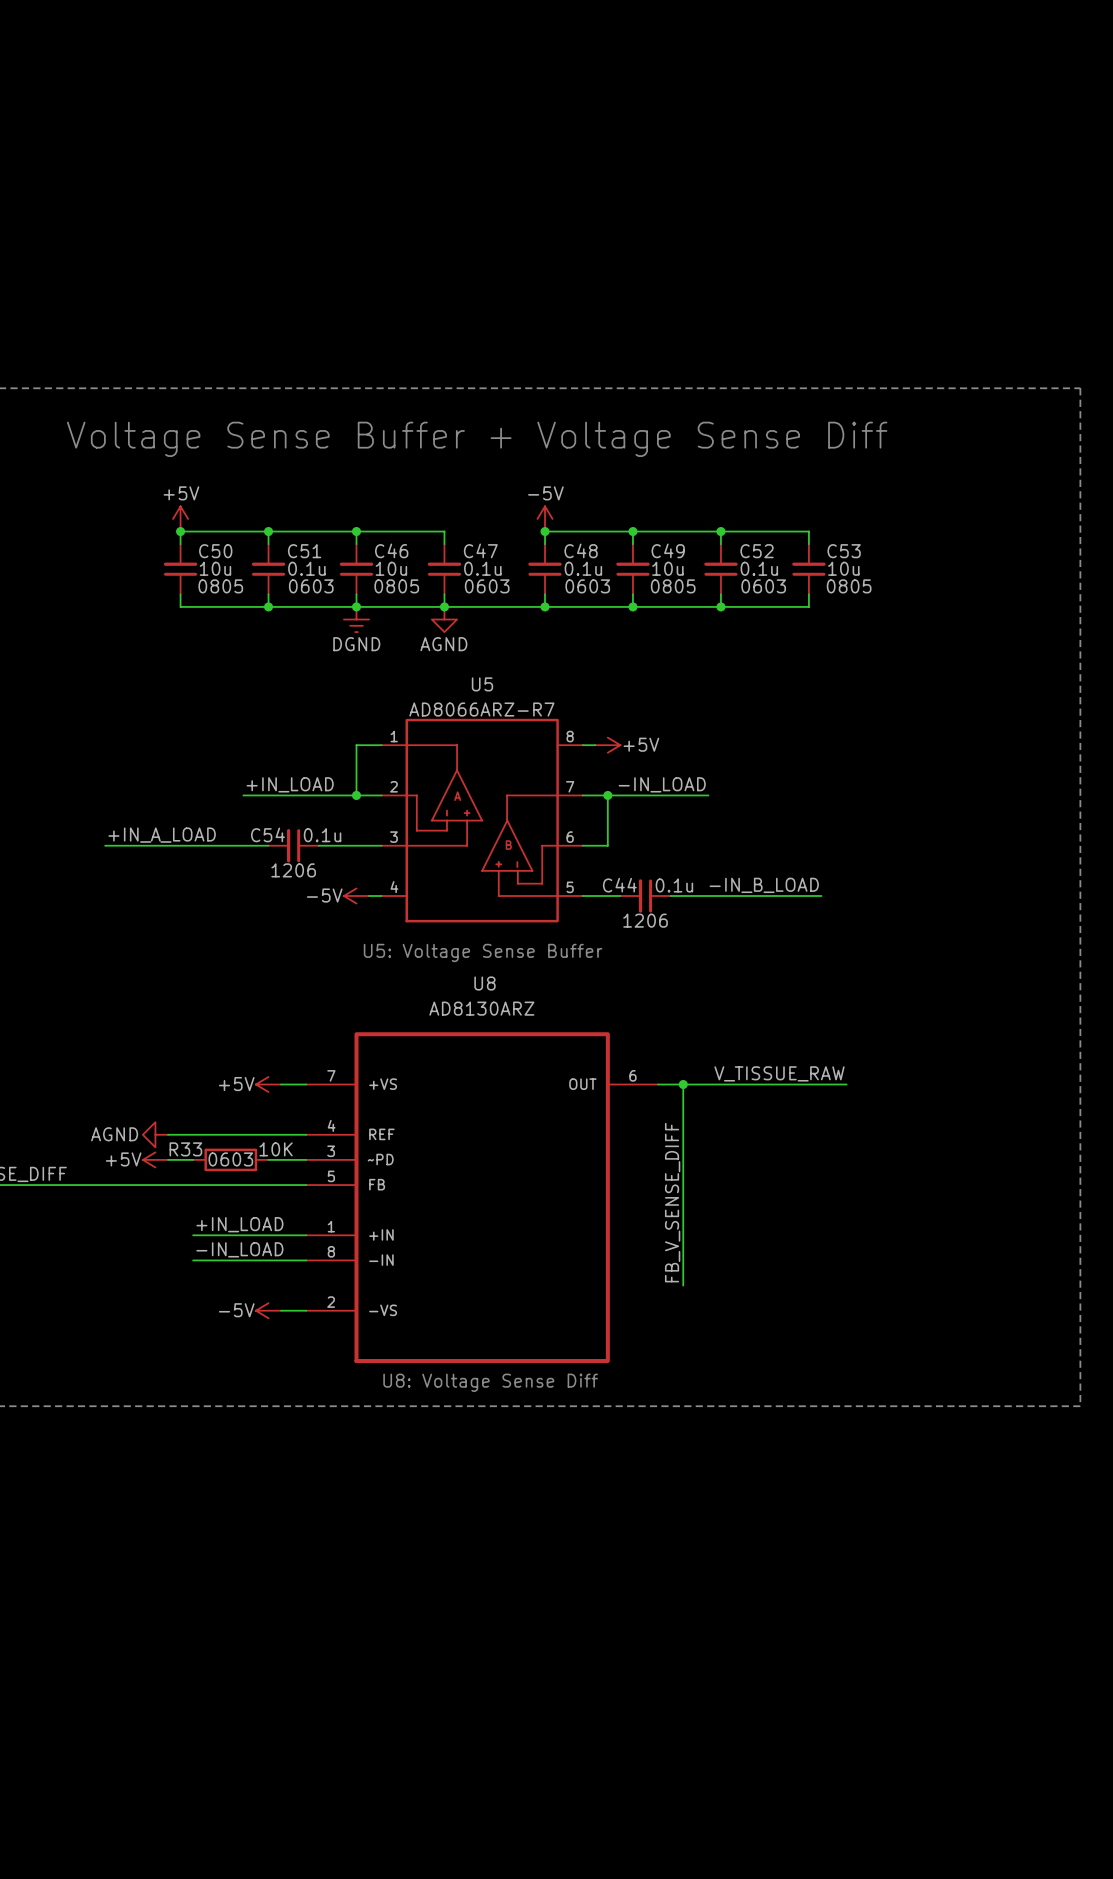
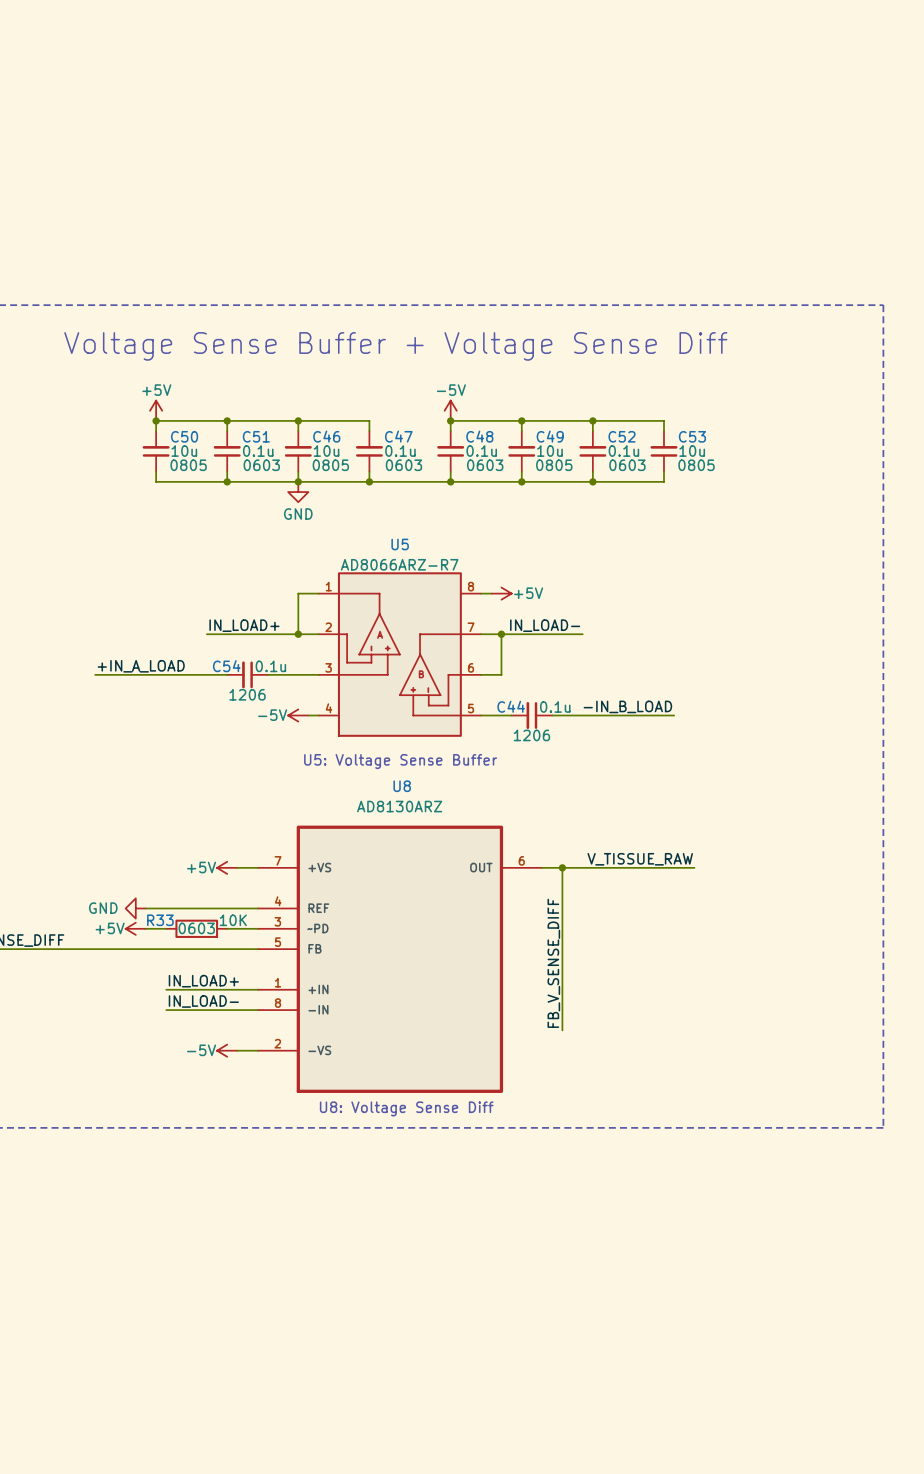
power symbol: DGND (356, 619) -> GND (298, 492)
power symbol: AGND (444, 619) -> none
label: +IN_LOAD (290, 784) -> IN_LOAD+ (244, 625)
label: -IN_LOAD (662, 784) -> IN_LOAD- (545, 625)
power symbol: AGND (155, 1134) -> GND (135, 908)
label: +IN_LOAD (239, 1224) -> IN_LOAD+ (203, 981)
label: -IN_LOAD (239, 1249) -> IN_LOAD- (203, 1001)

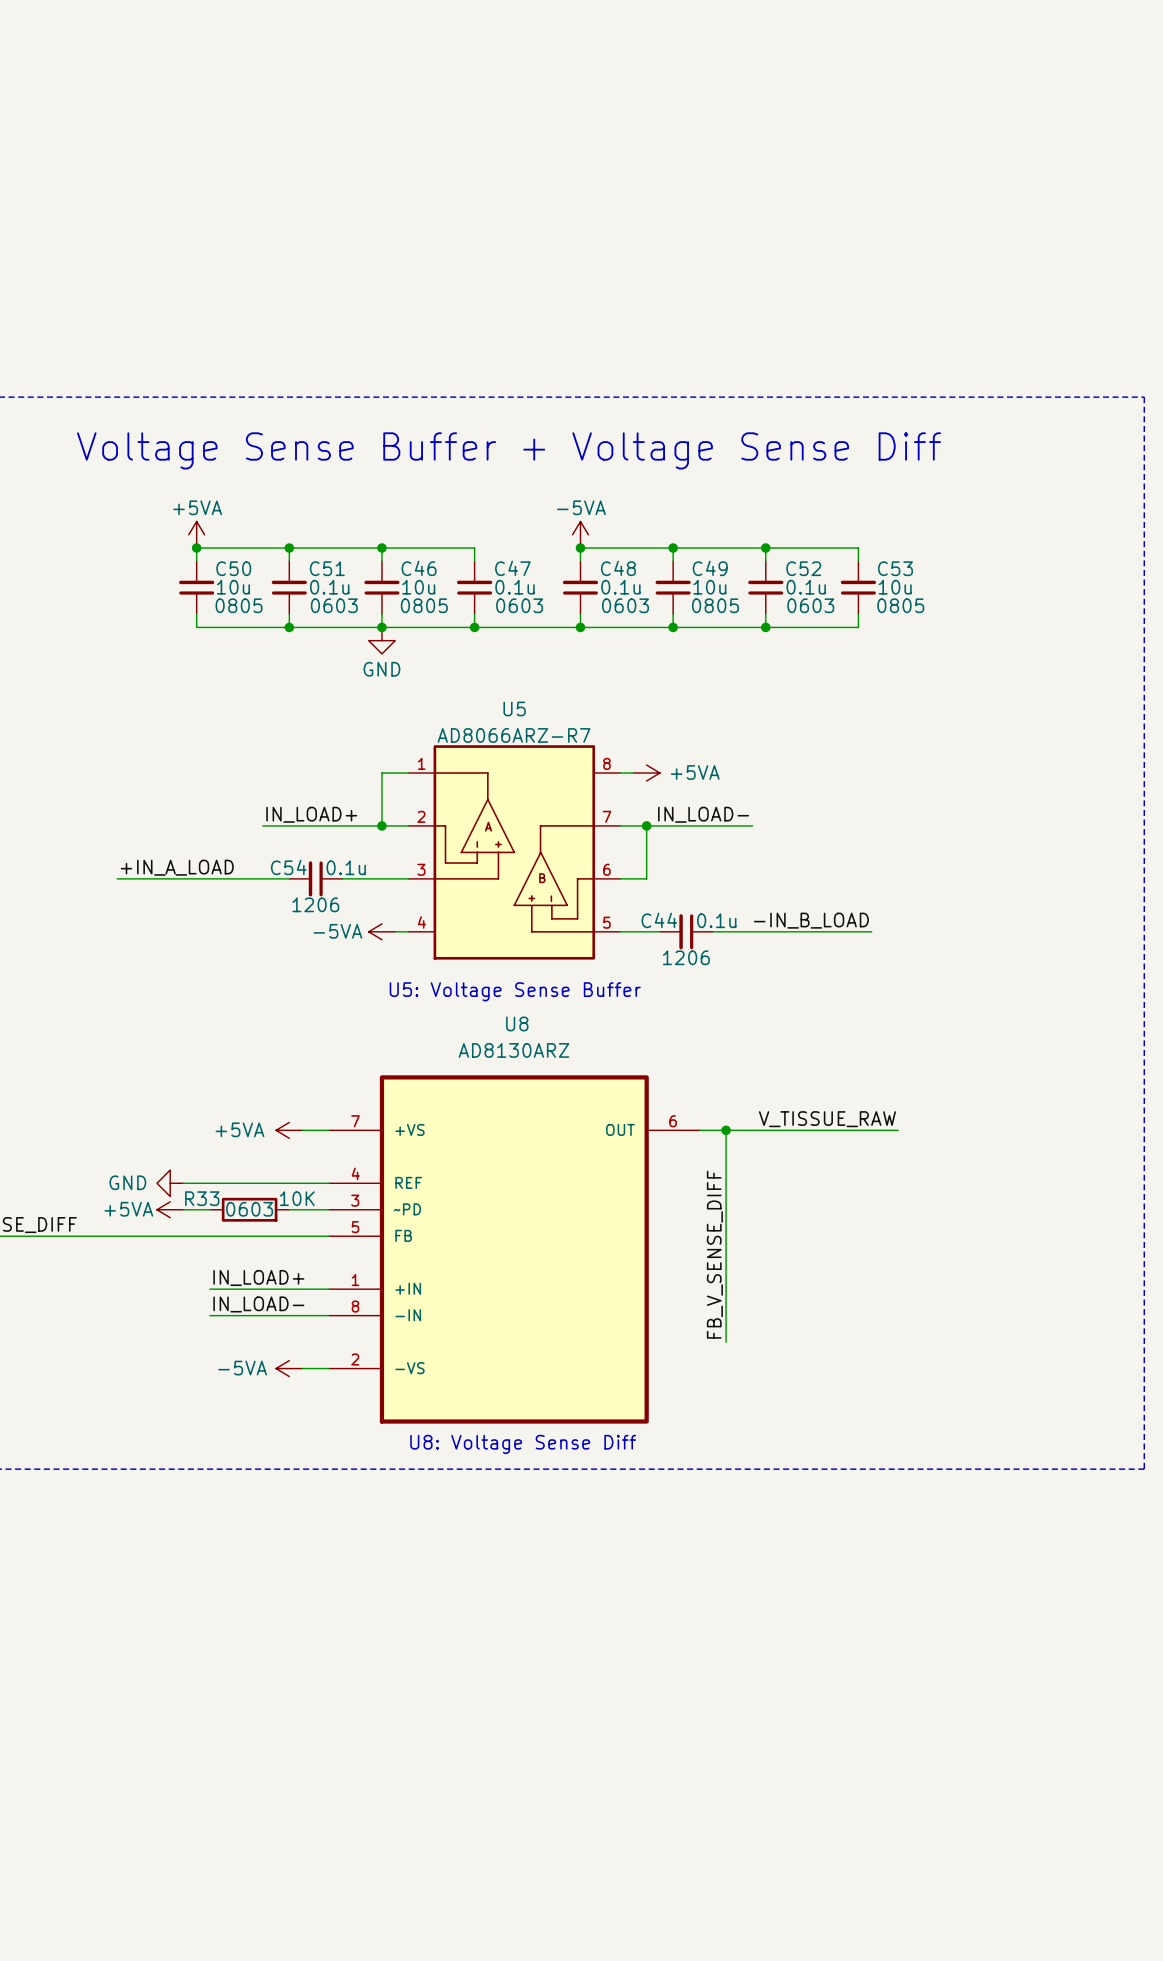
power symbol: +5V (156, 410) -> +5VA (196, 534)
power symbol: -5V (450, 410) -> -5VA (580, 534)
power symbol: +5V (501, 593) -> +5VA (646, 773)
power symbol: -5V (298, 715) -> -5VA (381, 931)
power symbol: +5V (227, 867) -> +5VA (289, 1130)
power symbol: +5V (135, 928) -> +5VA (170, 1209)
power symbol: -5V (227, 1050) -> -5VA (289, 1368)

